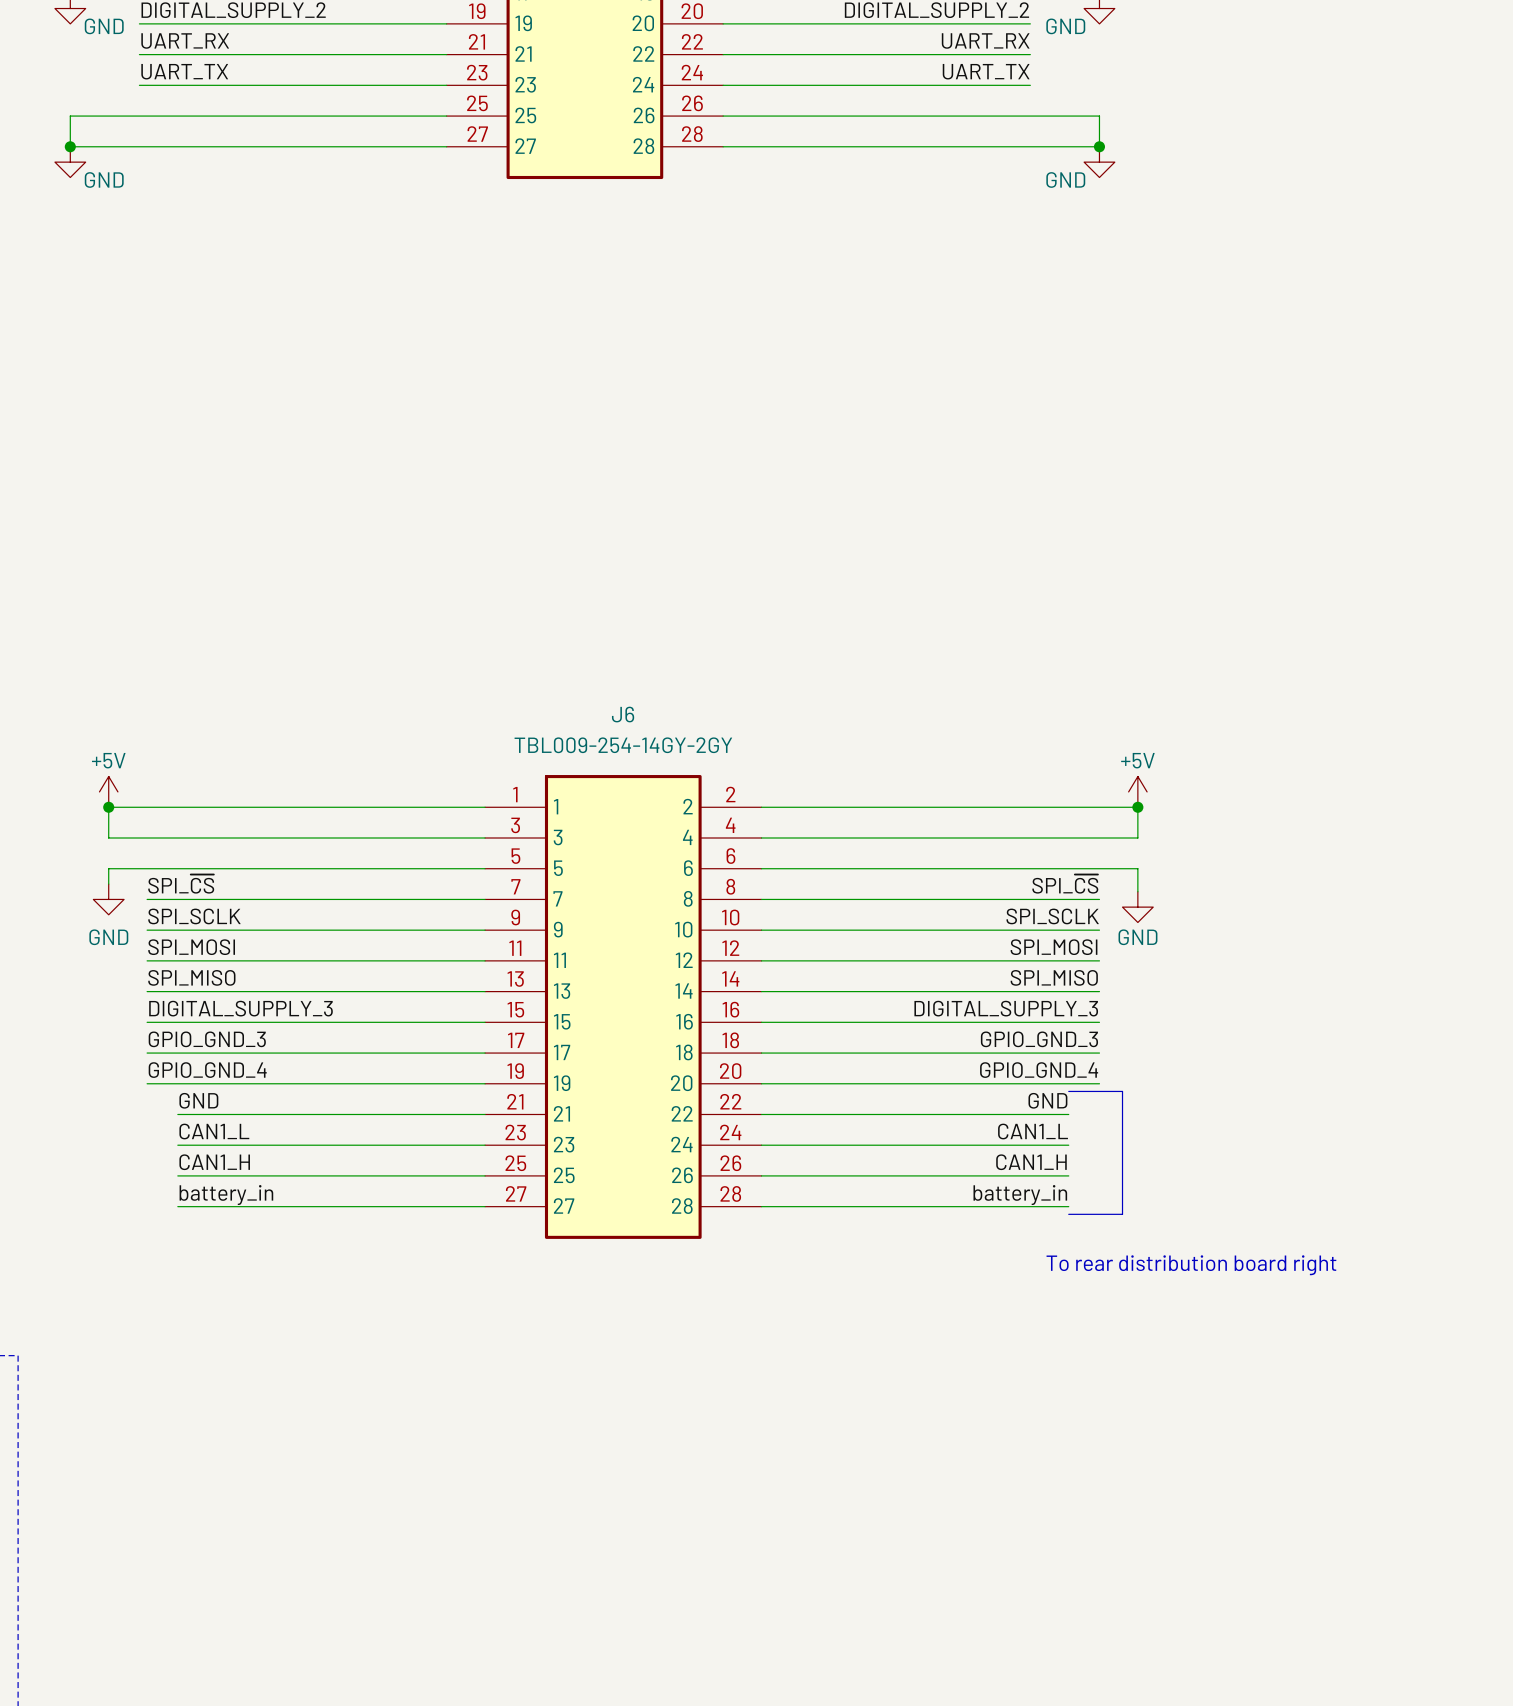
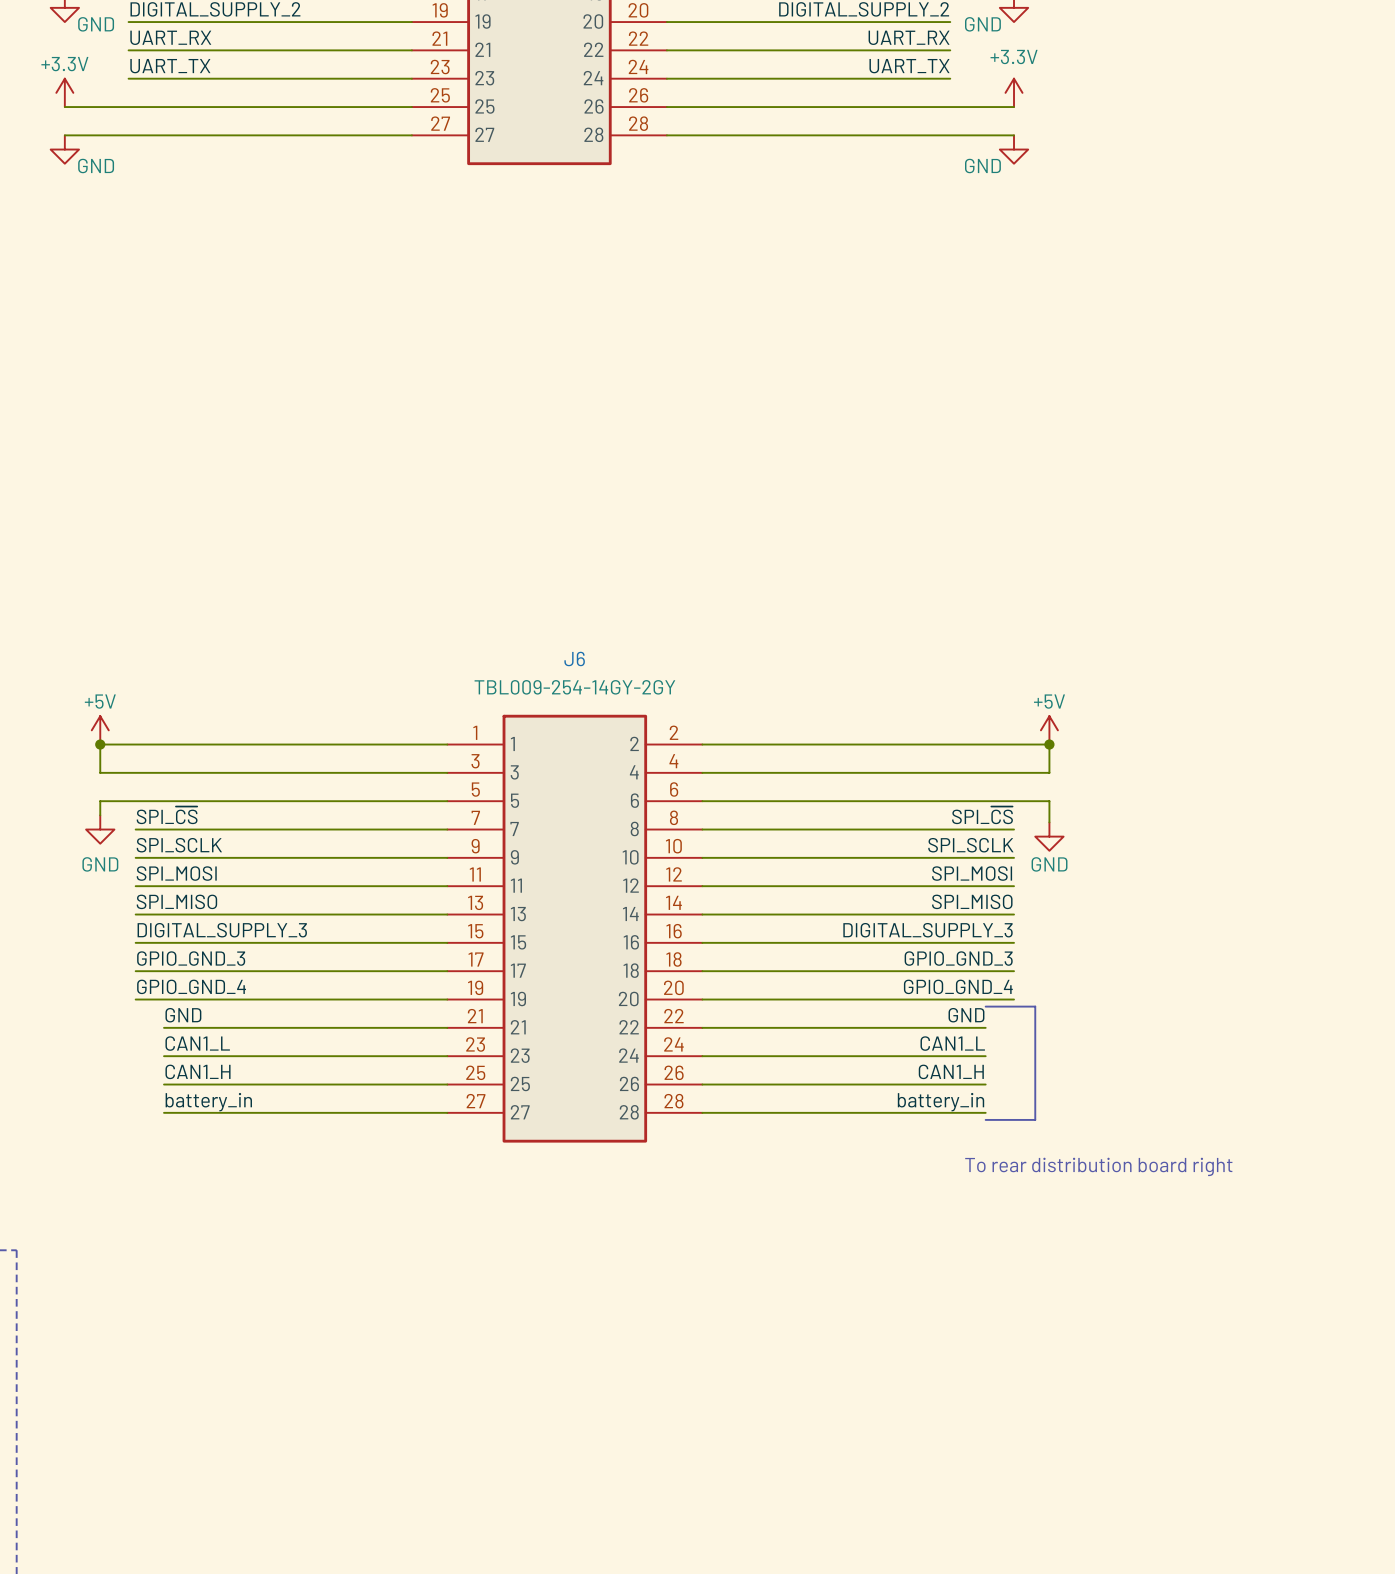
power symbol: none -> +3.3V (64, 92)
power symbol: none -> +3.3V (1014, 92)
wire: (70, 116) (70, 146) -> none
wire: (1099, 116) (1099, 146) -> none
junction: (70, 146) -> none
junction: (1099, 146) -> none

